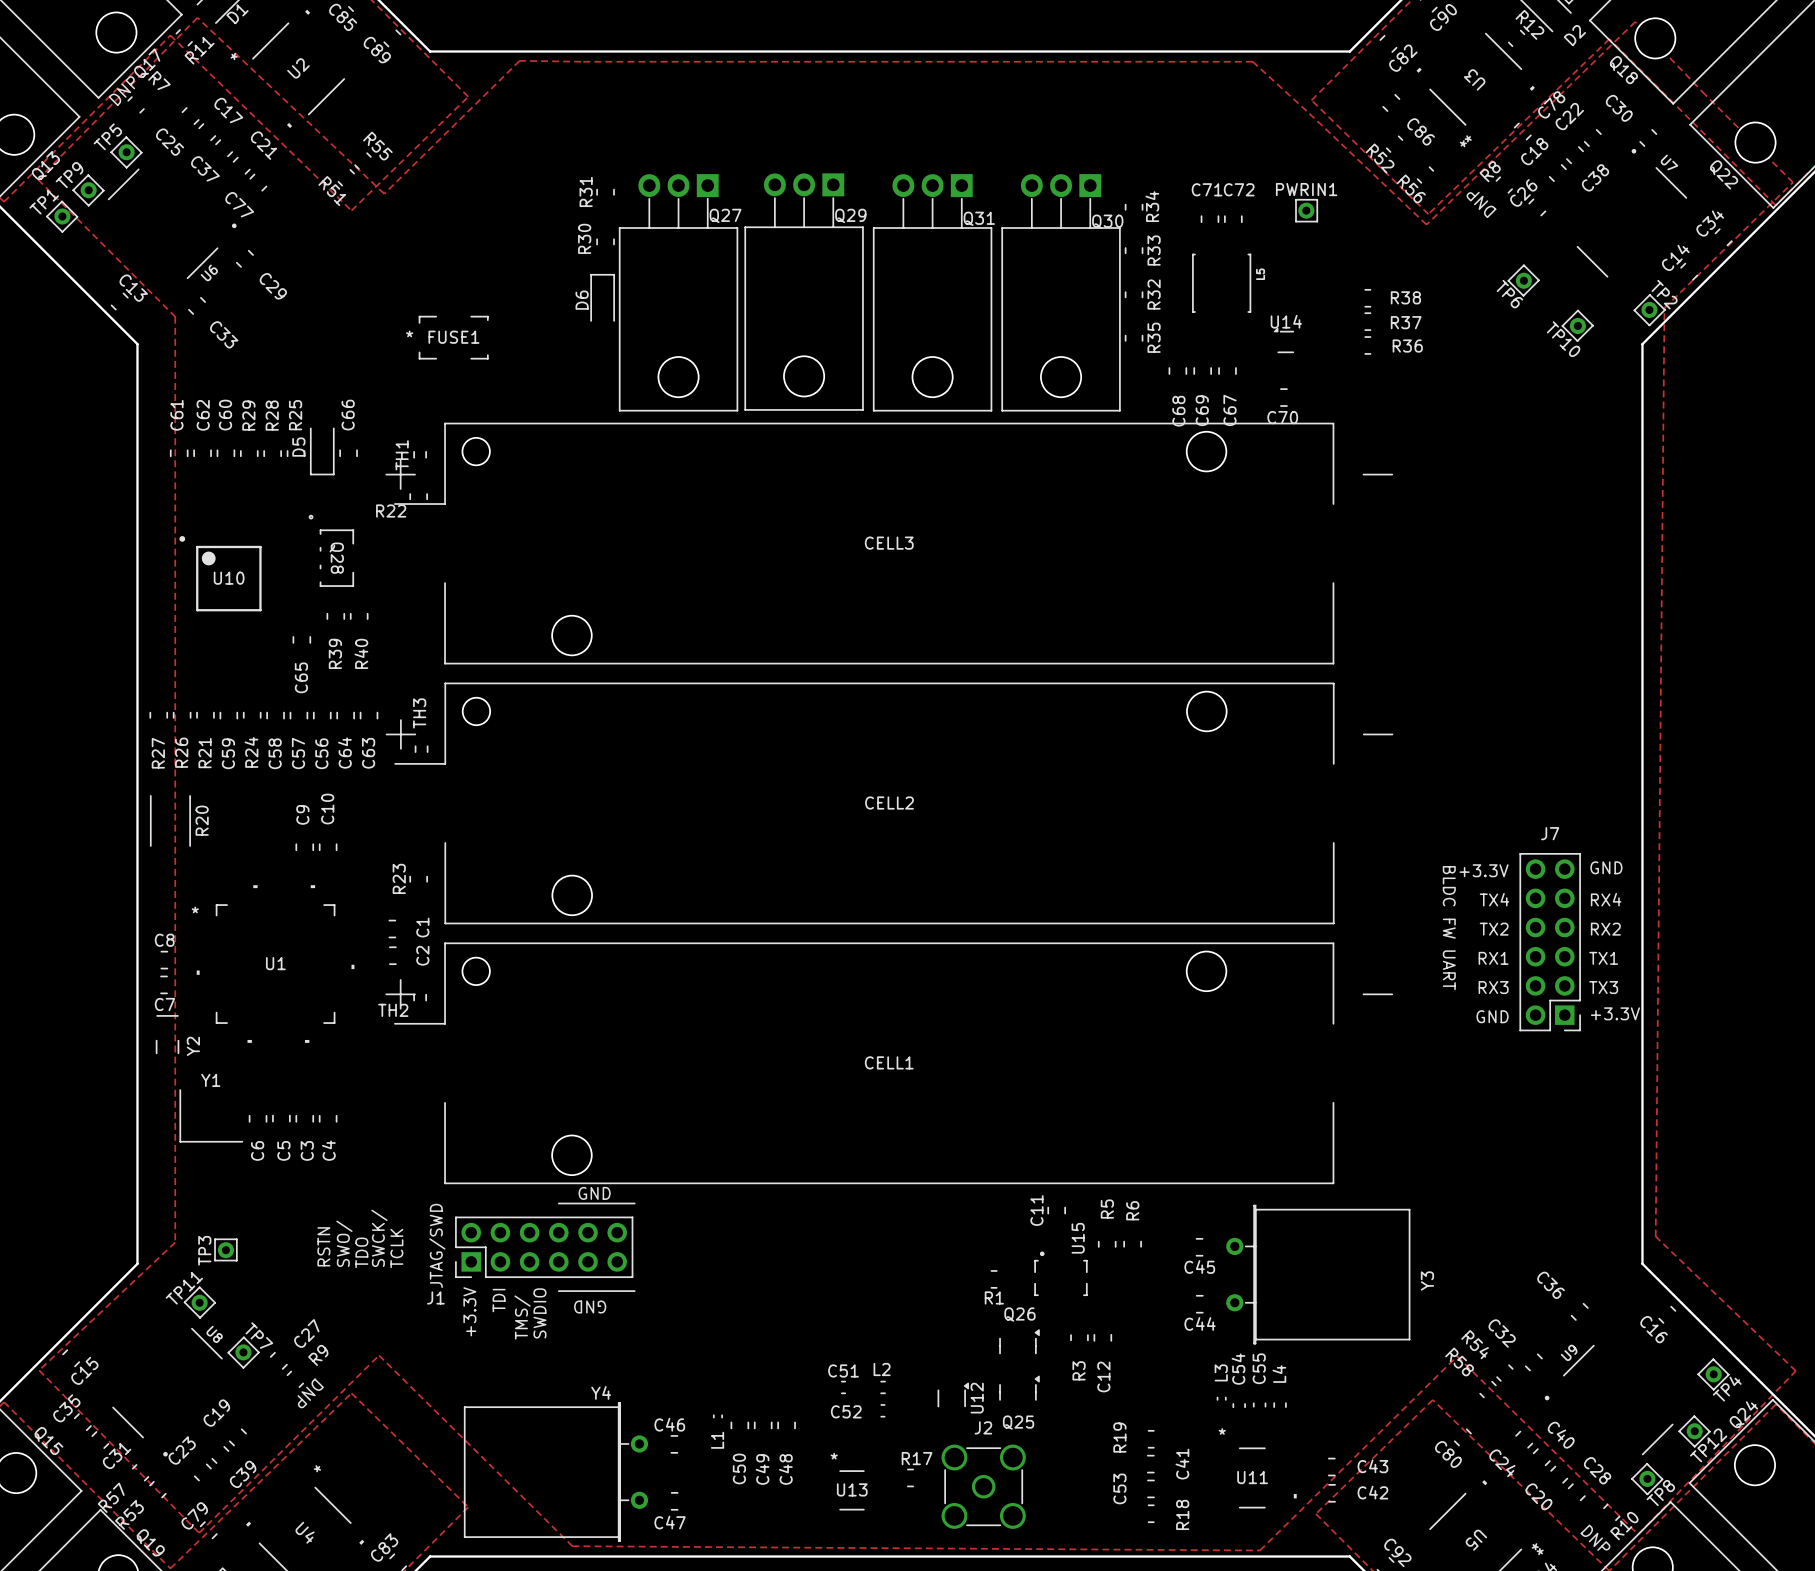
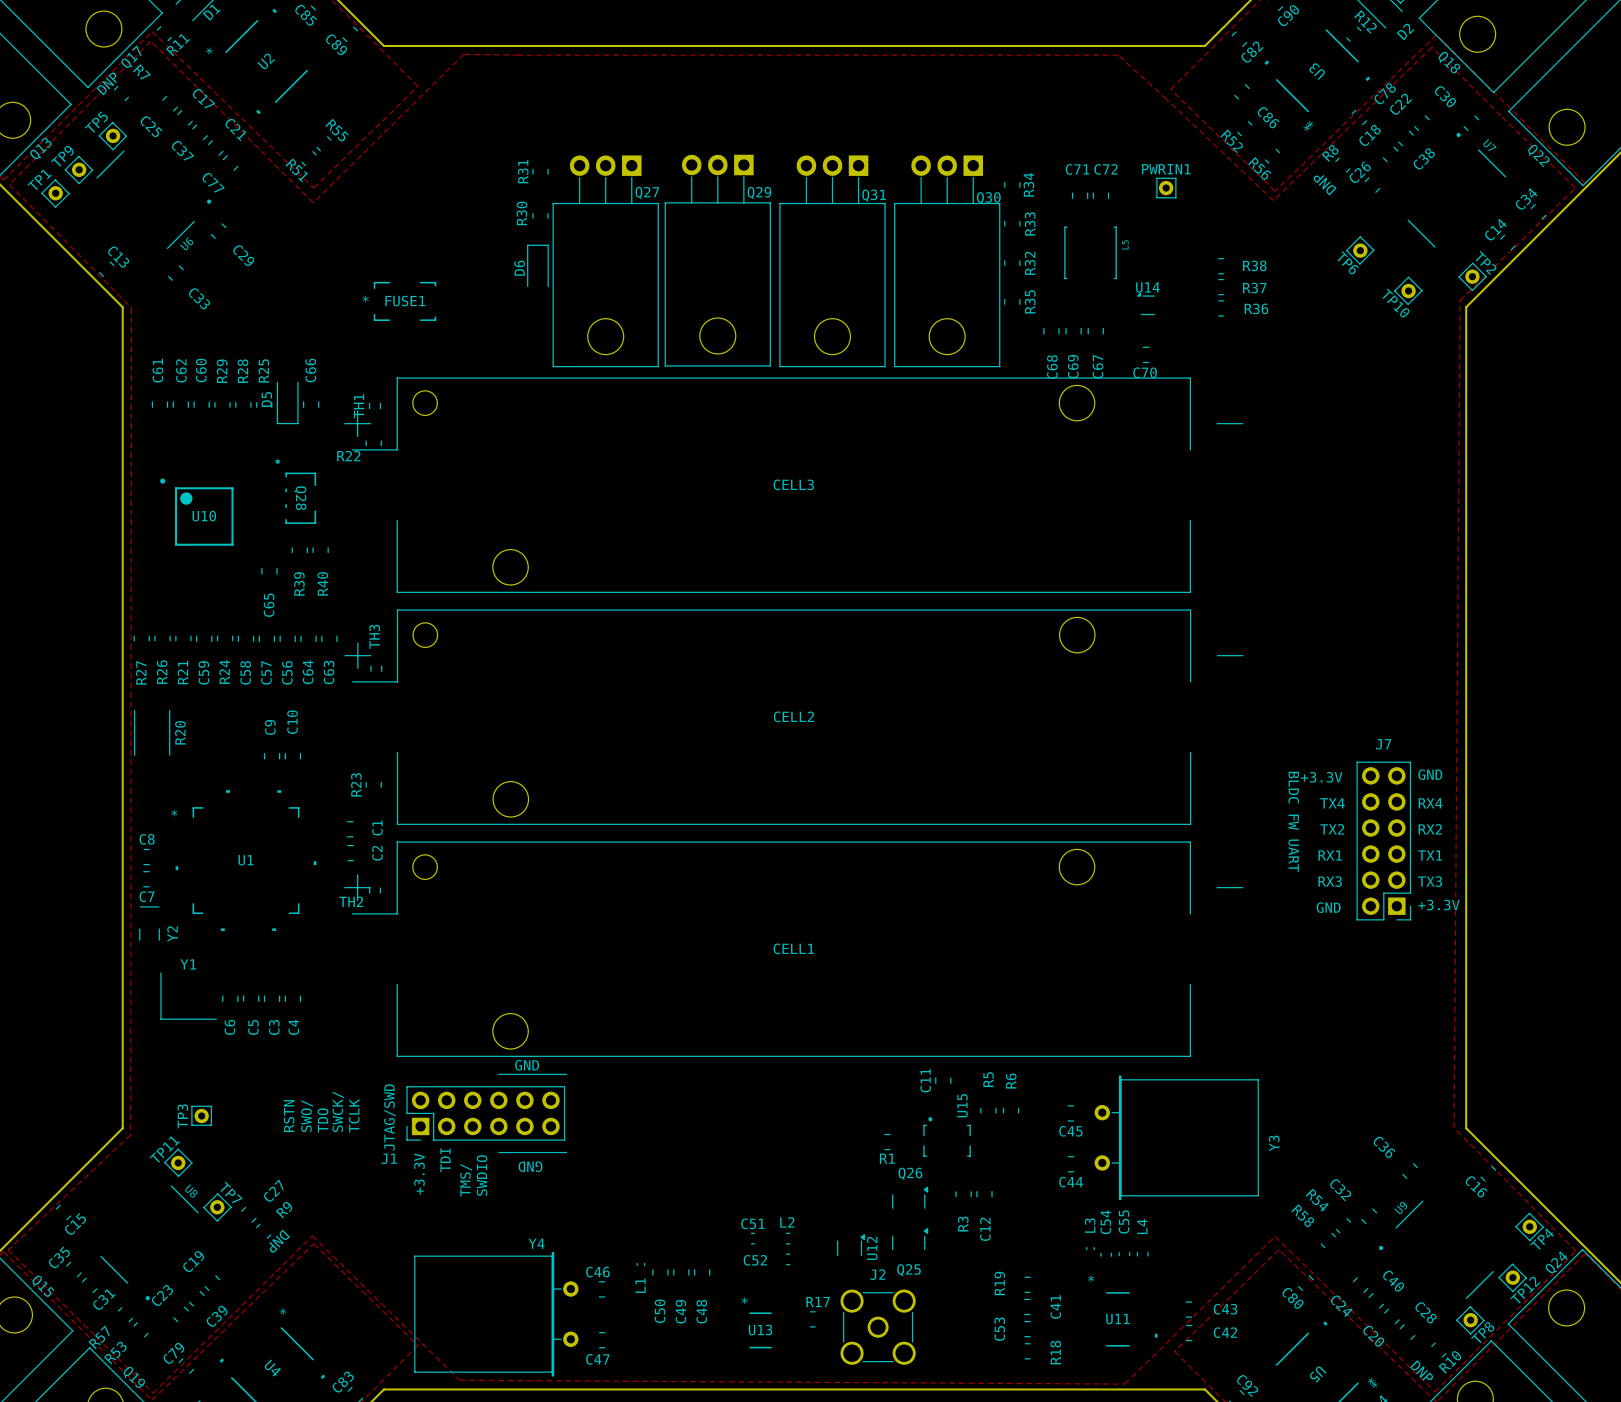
zone outline: (519, 60) (384, 193) (197, 17) (38, 179) (175, 316) (175, 1242) (39, 1370) (199, 1533) (379, 1355) (572, 1546) (1260, 1550) (1457, 1356) (1638, 1534) (1795, 1370) (1655, 1236) (1664, 308) (1792, 182) (1635, 21) (1426, 224) -> (463, 54) (313, 202) (150, 41) (9, 184) (131, 307) (130, 1134) (8, 1249) (153, 1393) (312, 1235) (459, 1380) (1124, 1384) (1275, 1236) (1435, 1391) (1575, 1251) (1454, 1127) (1460, 300) (1575, 187) (1432, 47) (1273, 200)

